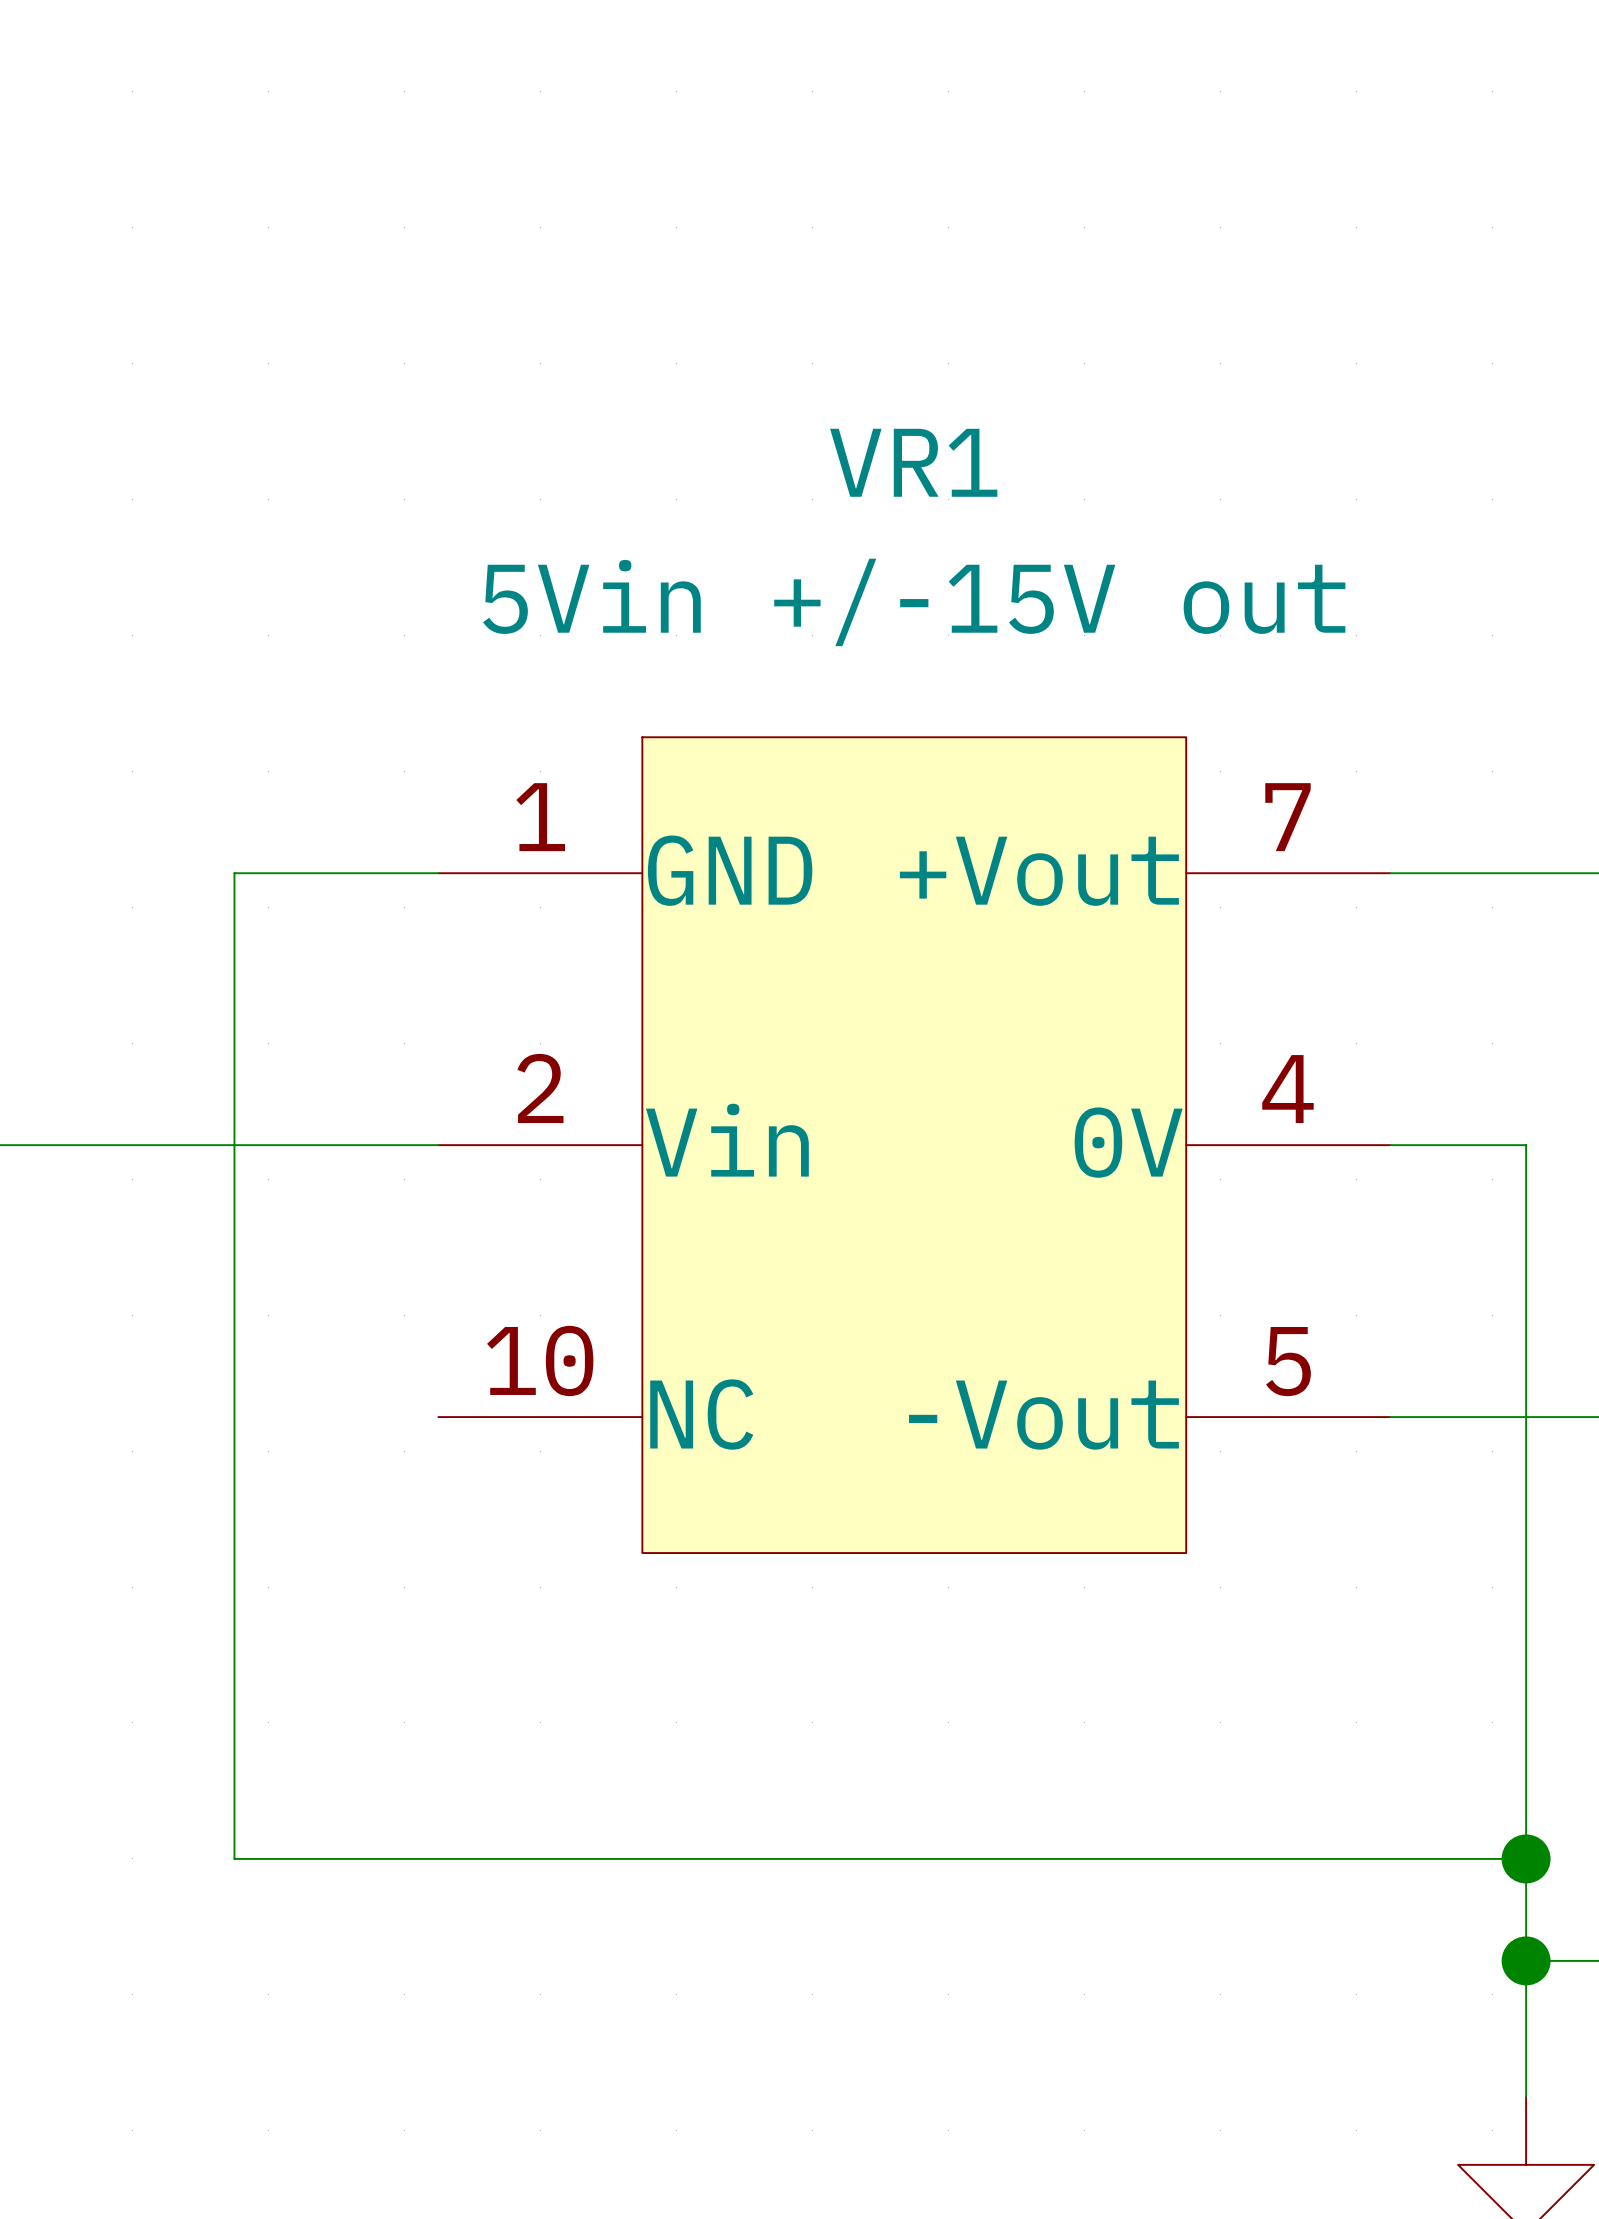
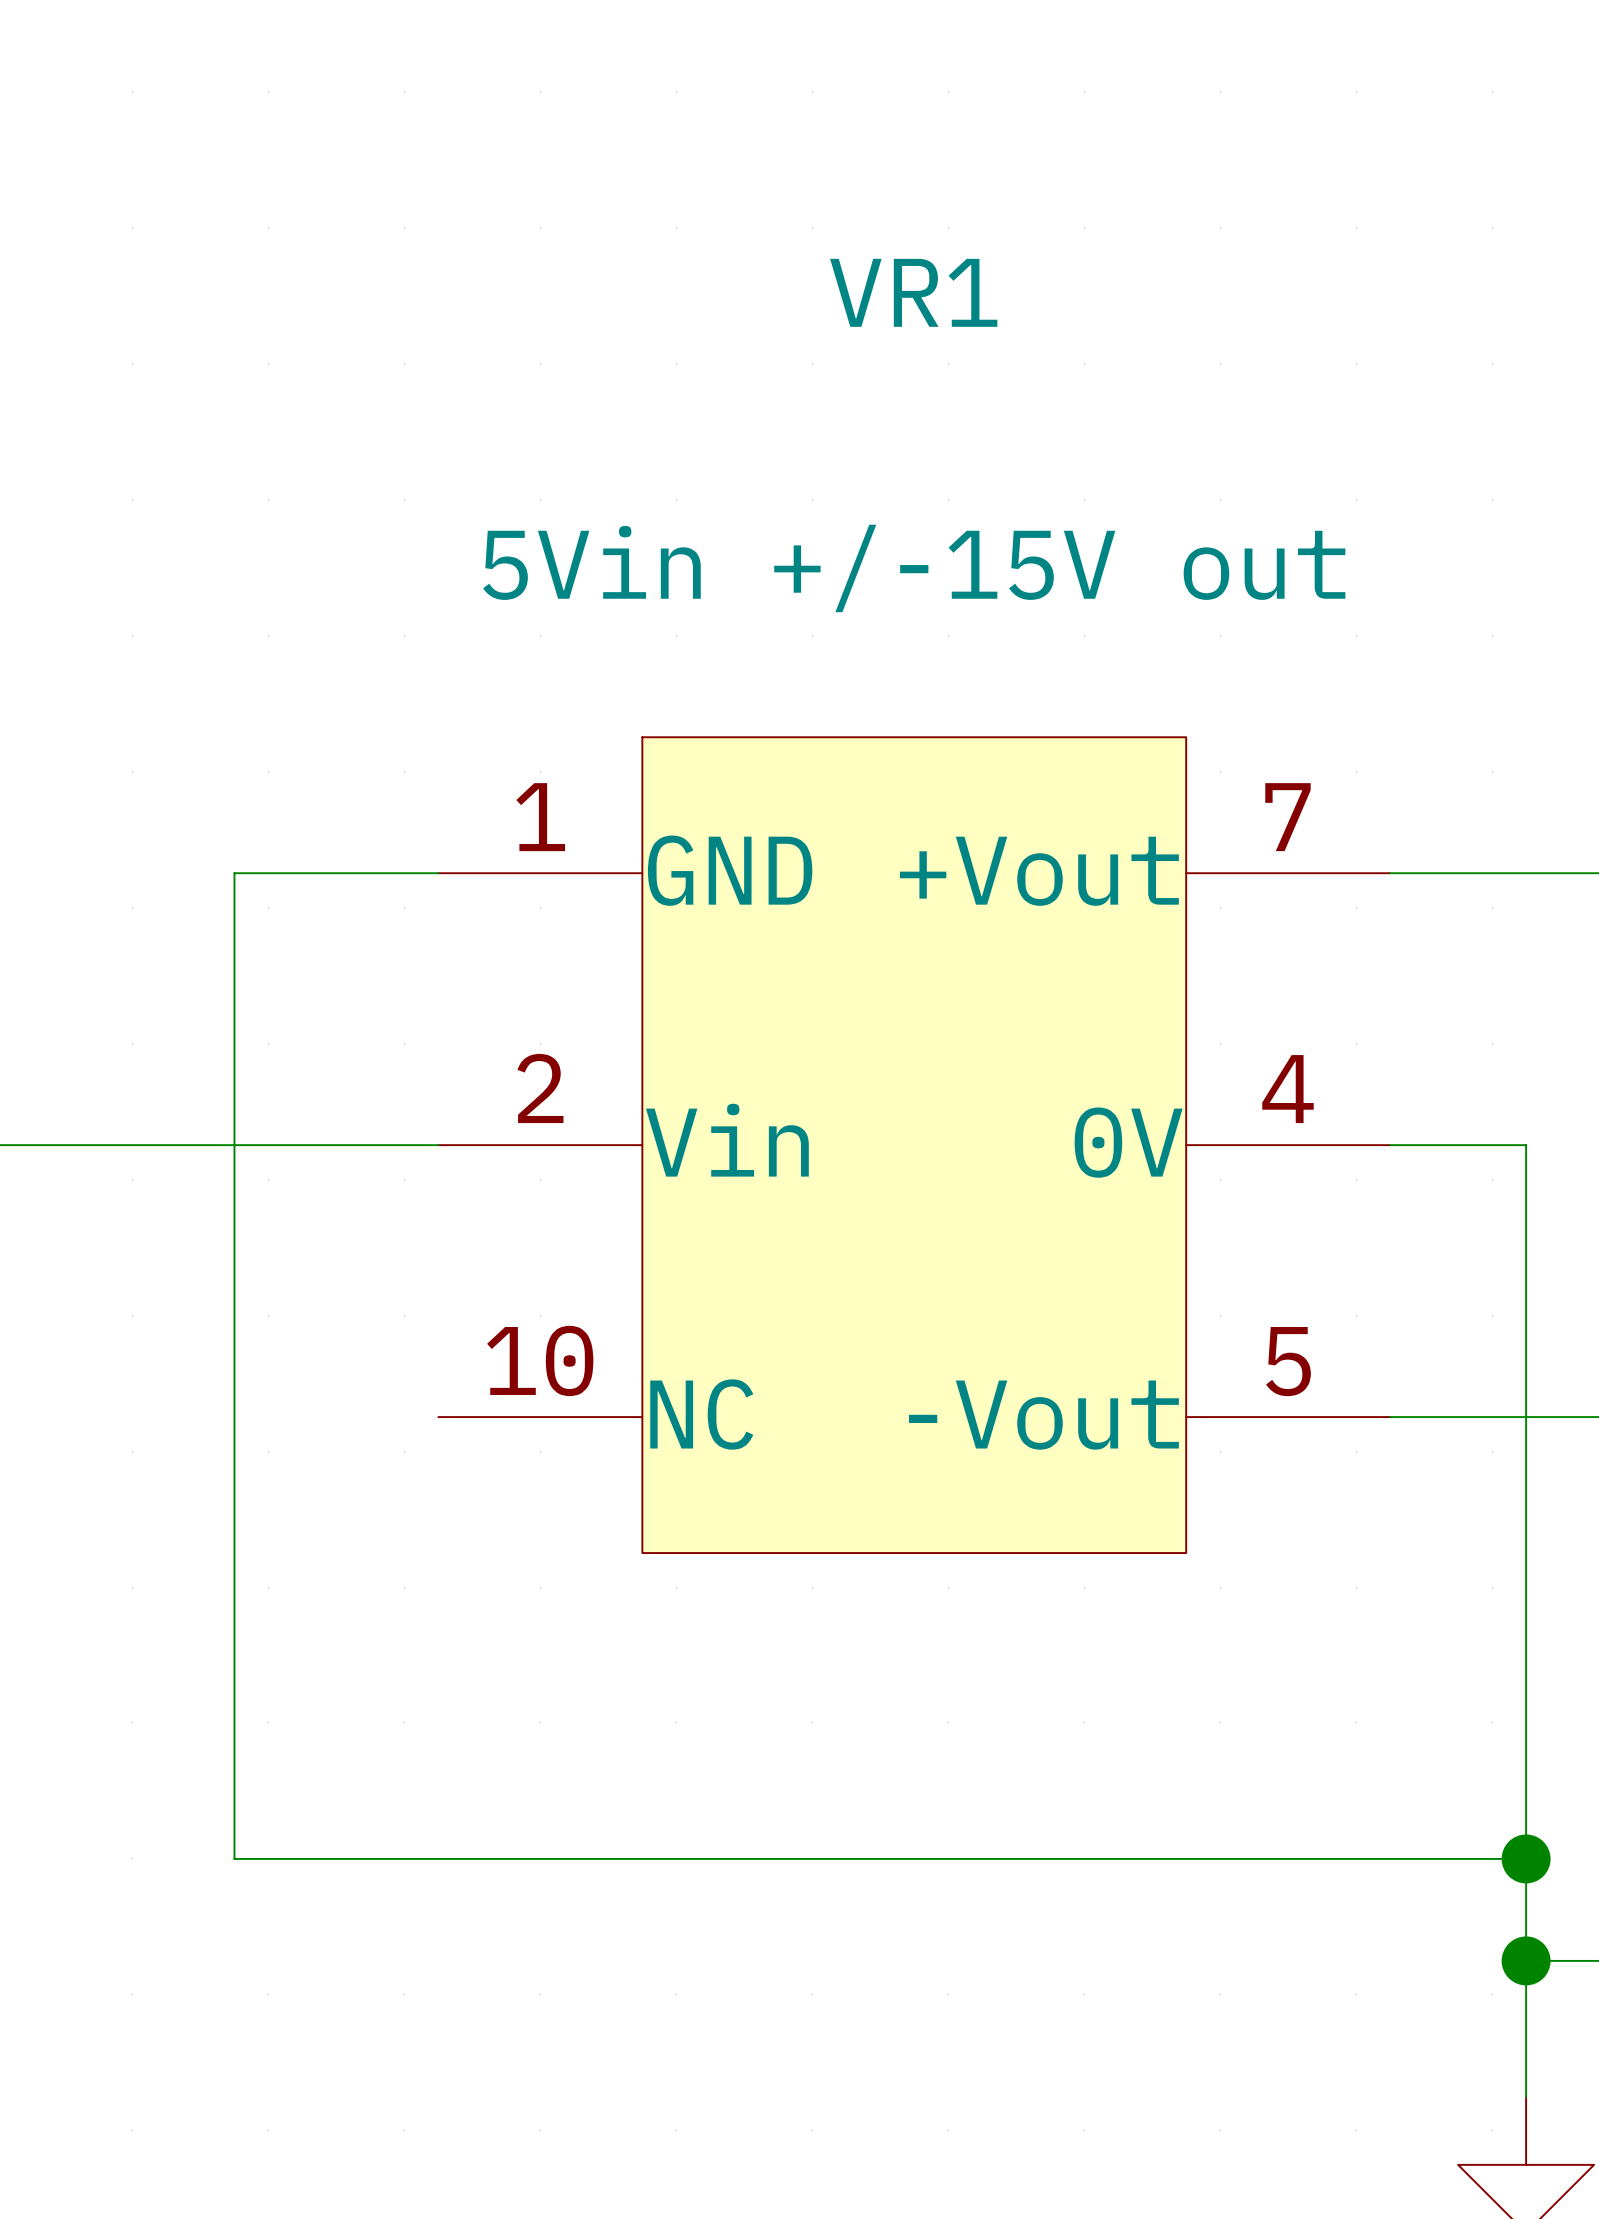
VR1 name position: VR1 (913, 462) -> VR1 (913, 292)
VR1 text position: 5Vin +/-15V out (914, 602) -> 5Vin +/-15V out (914, 568)

